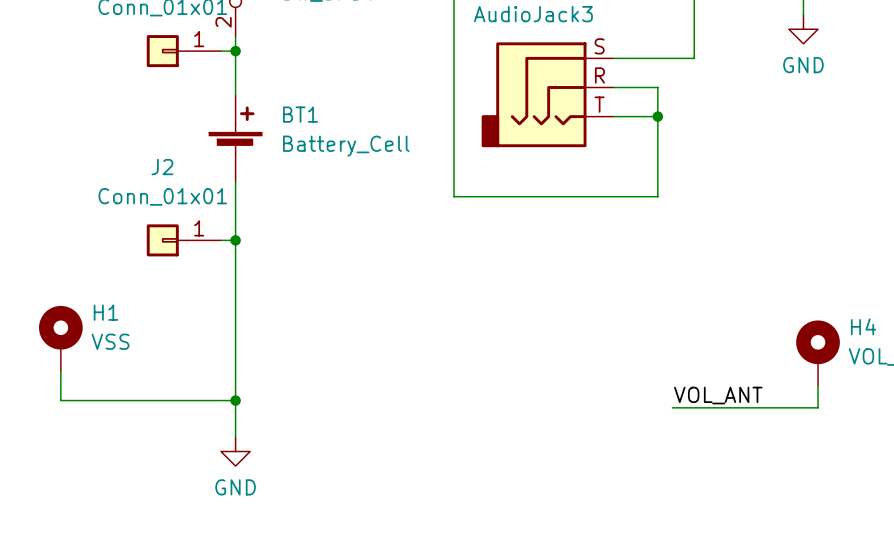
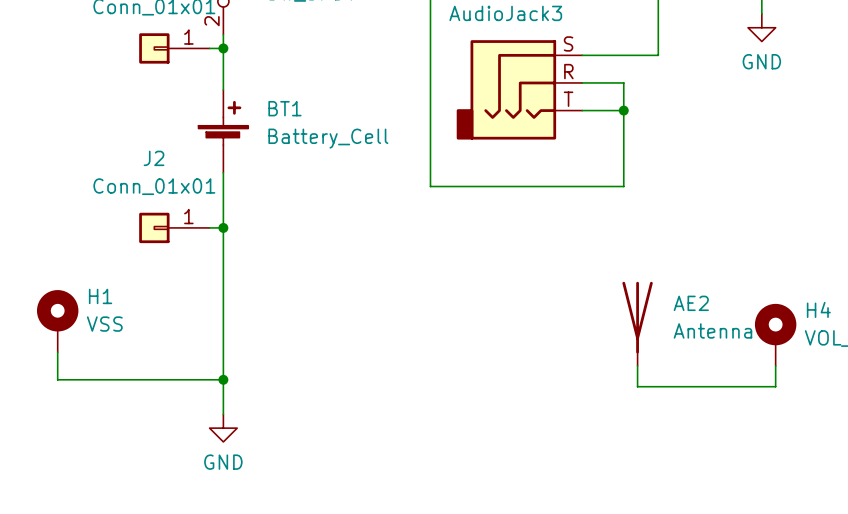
AE2: none -> Antenna (637, 323)
wire: none -> (637, 366) (637, 386)
label: VOL_ANT (718, 395) -> none

